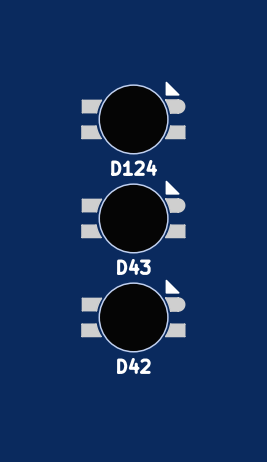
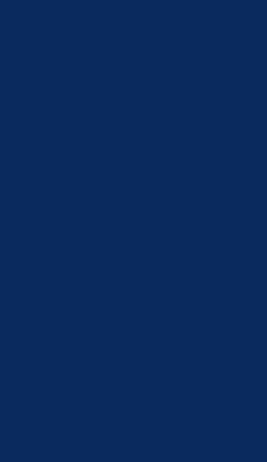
D124: (133, 117) -> none
D43: (133, 216) -> none
D42: (133, 315) -> none

